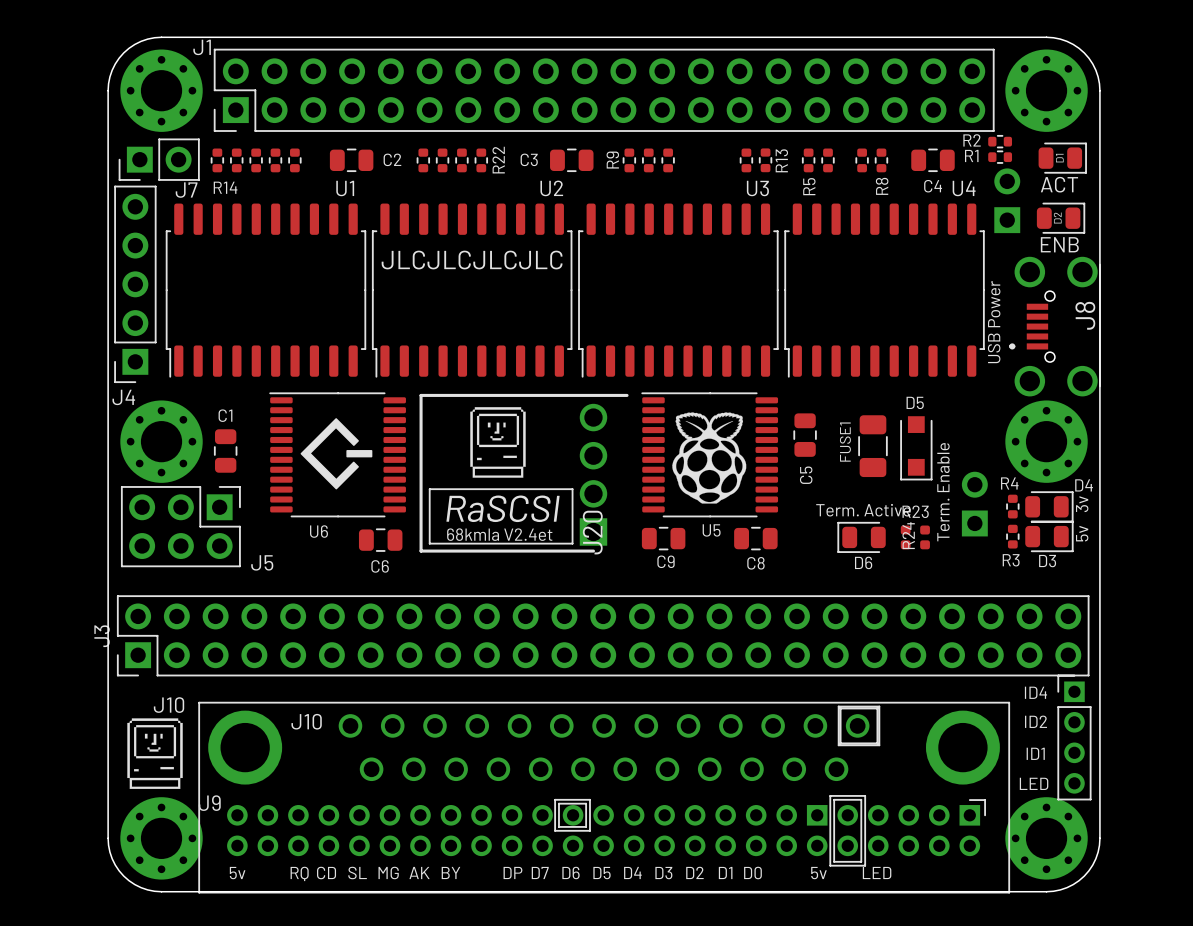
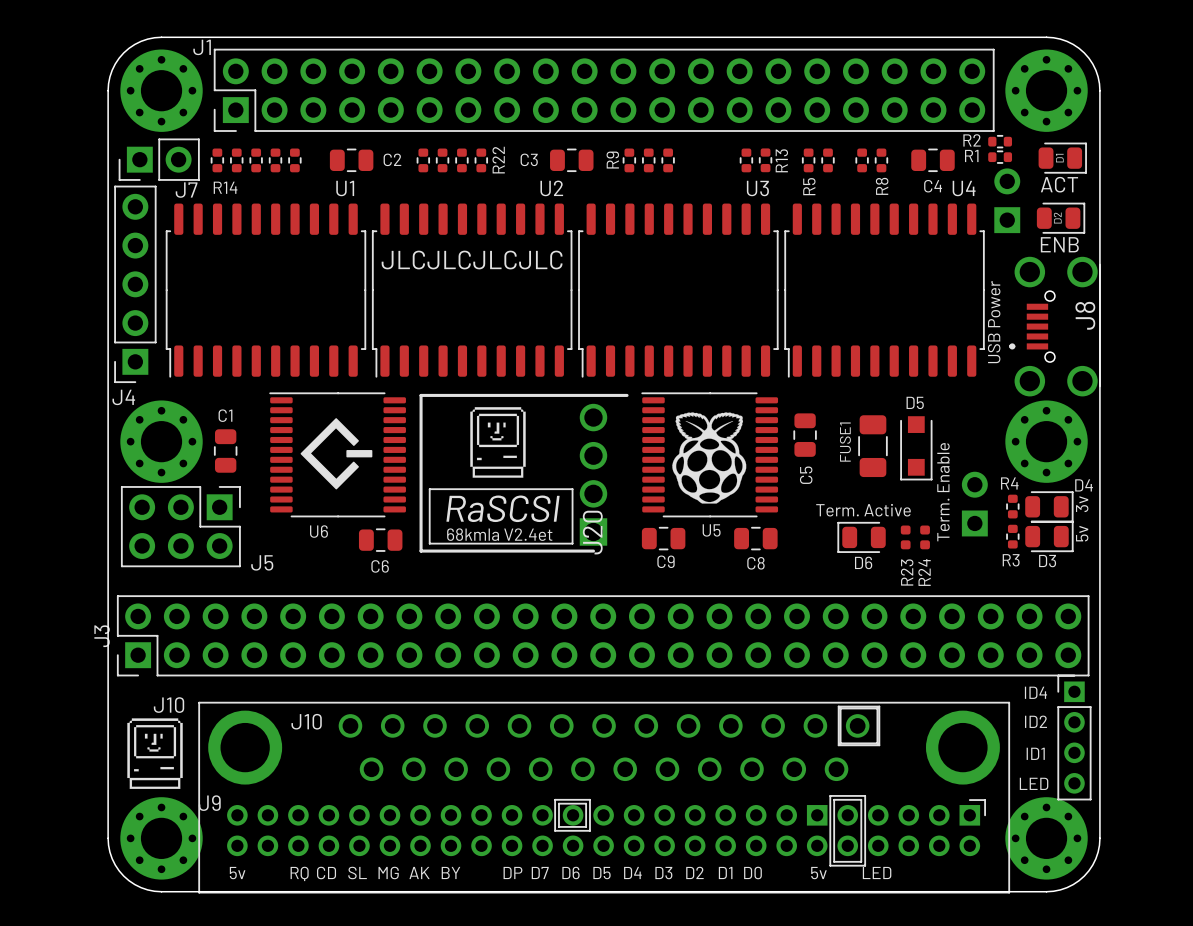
R23 name rotation: 0° (915, 511) -> 90° counterclockwise (907, 572)
R23 name position: R23 (915, 511) -> R23 (907, 572)
R24 name position: R24 (908, 535) -> R24 (924, 572)

